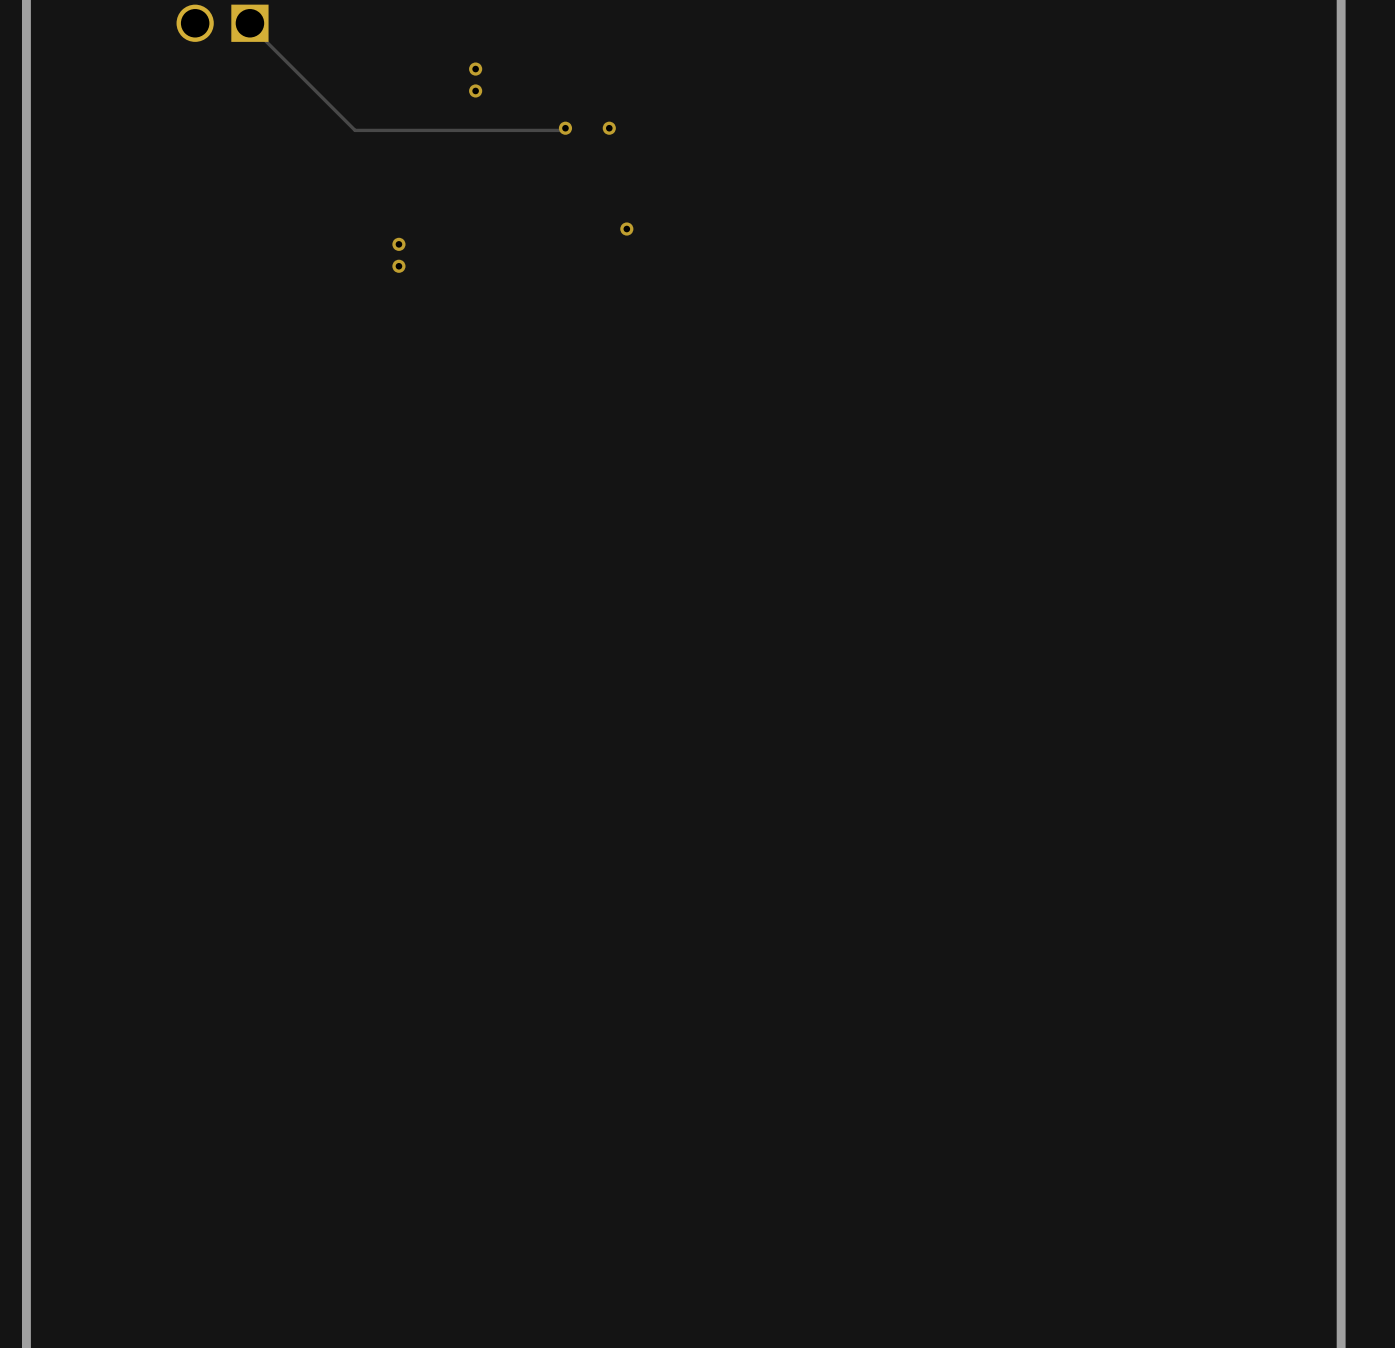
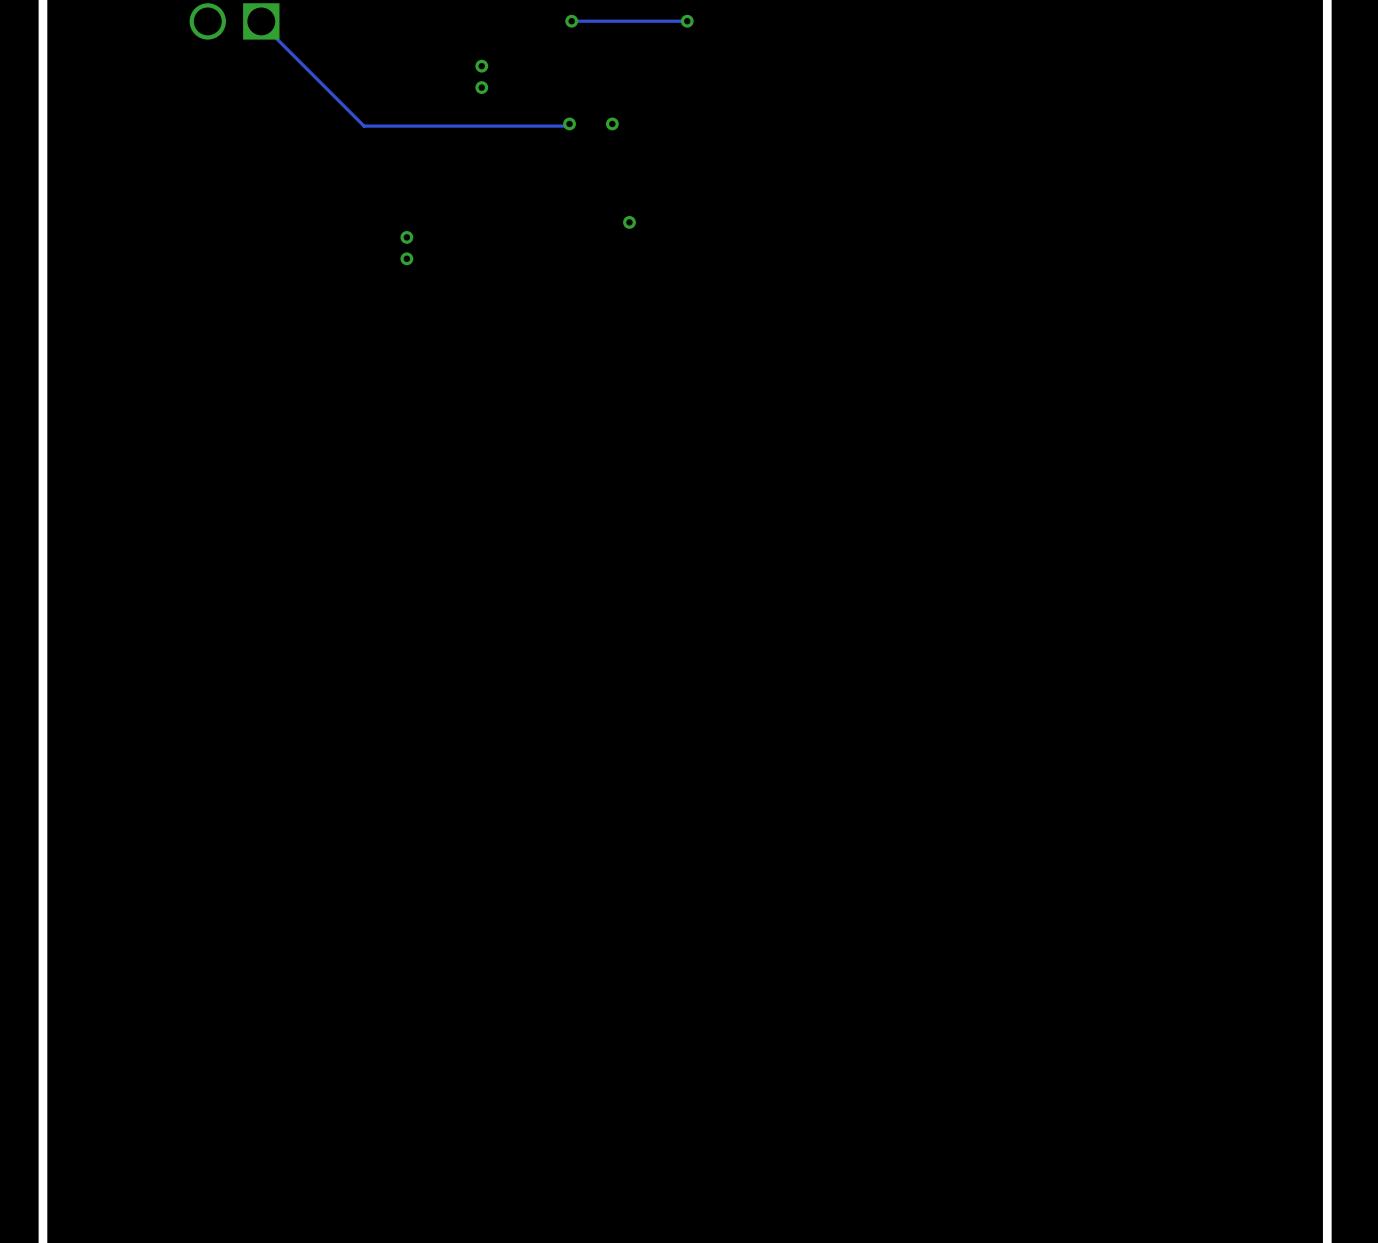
via: none -> (571, 21)
track: none -> (687, 21) (571, 21)
via: none -> (687, 21)

